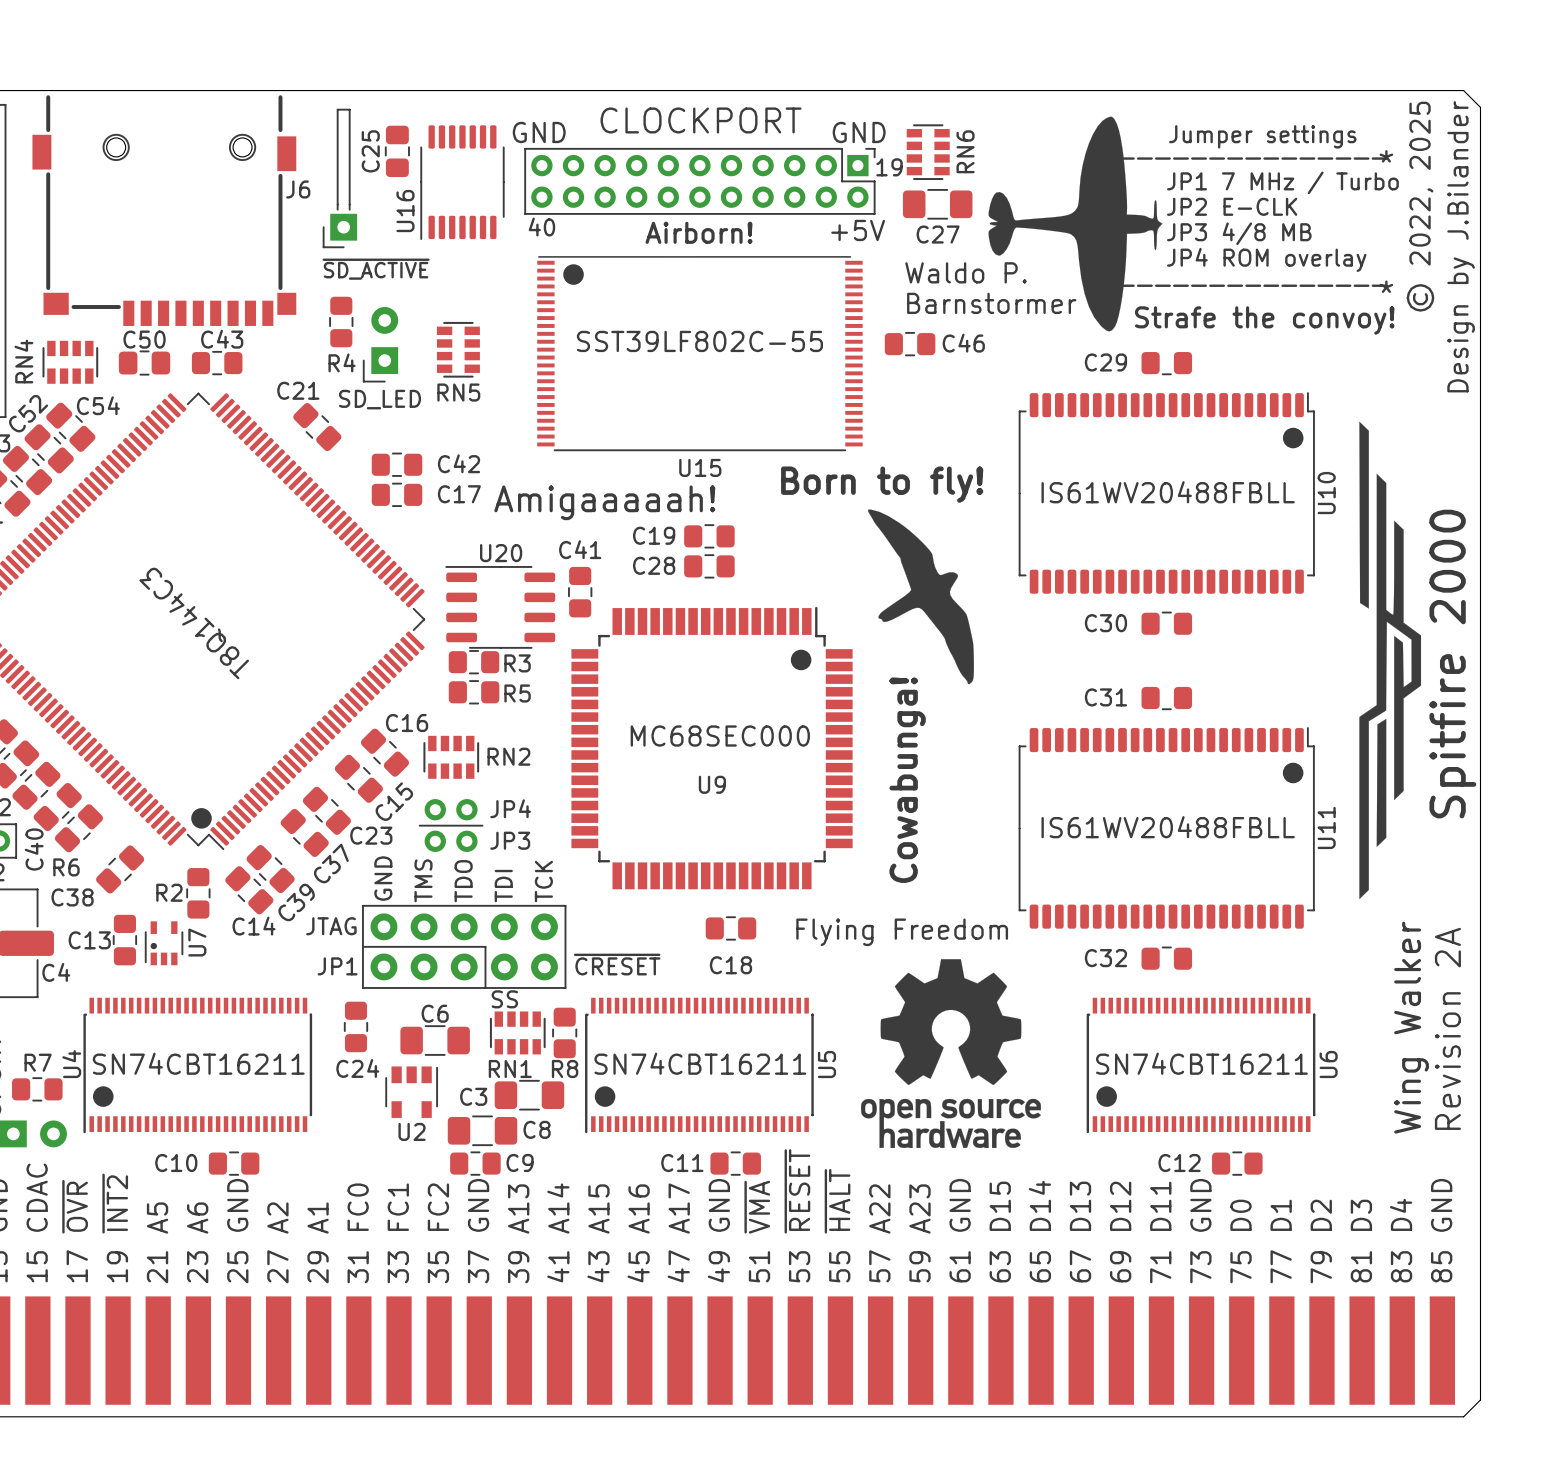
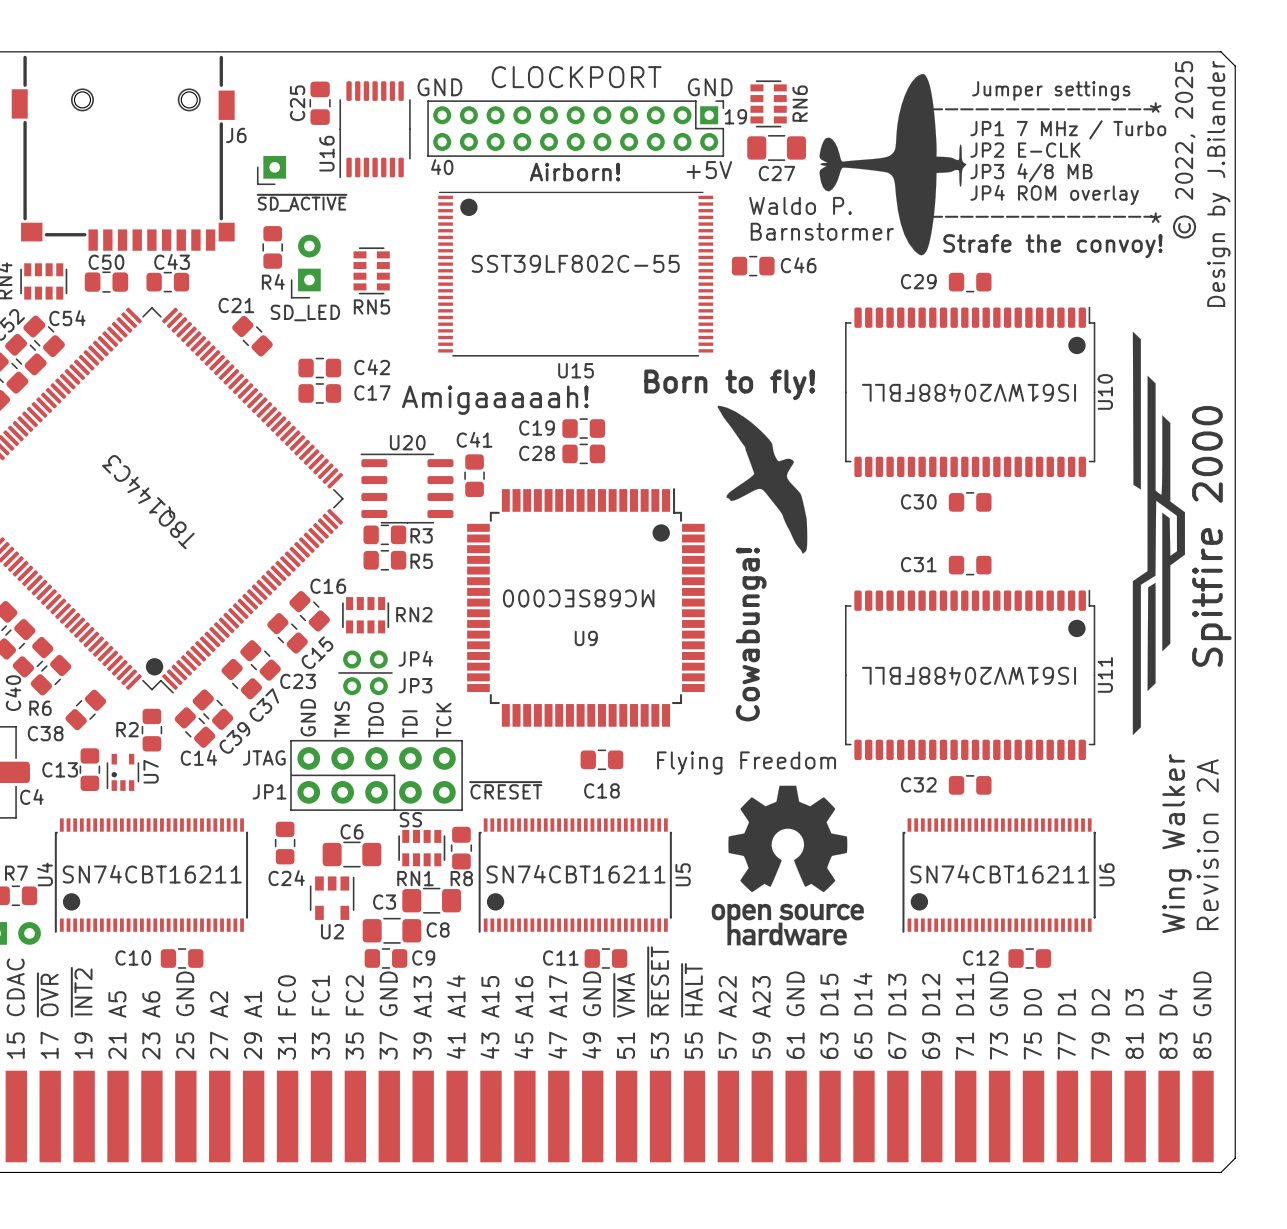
part: (339, 178) -> none
text rotation: 0° (1168, 492) -> 180° (969, 393)
text rotation: 0° (720, 736) -> 180° (578, 598)
text rotation: 0° (1168, 827) -> 180° (969, 676)

